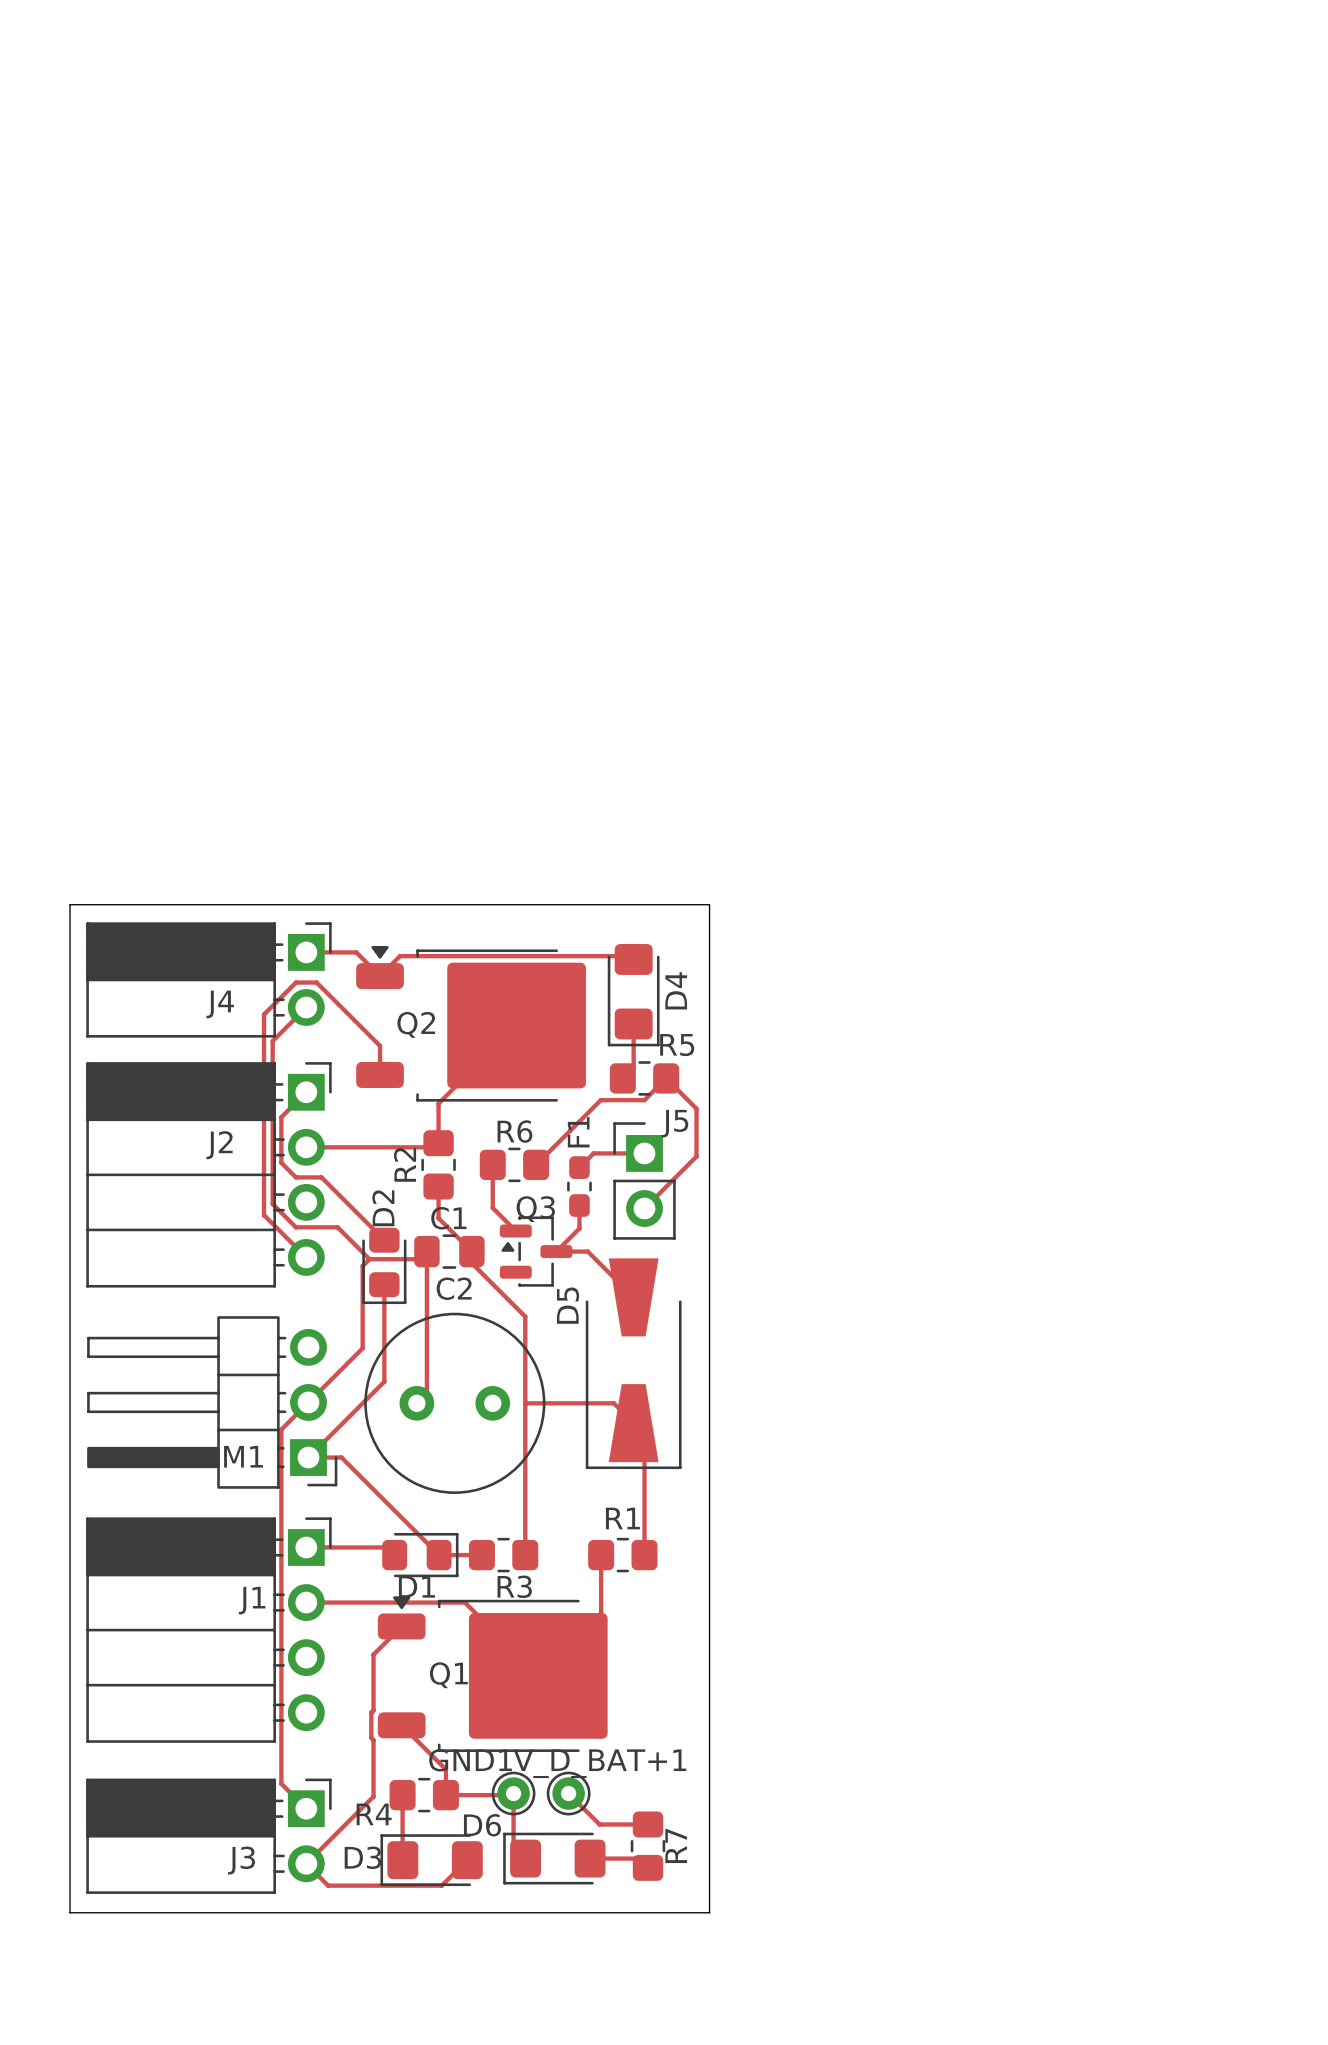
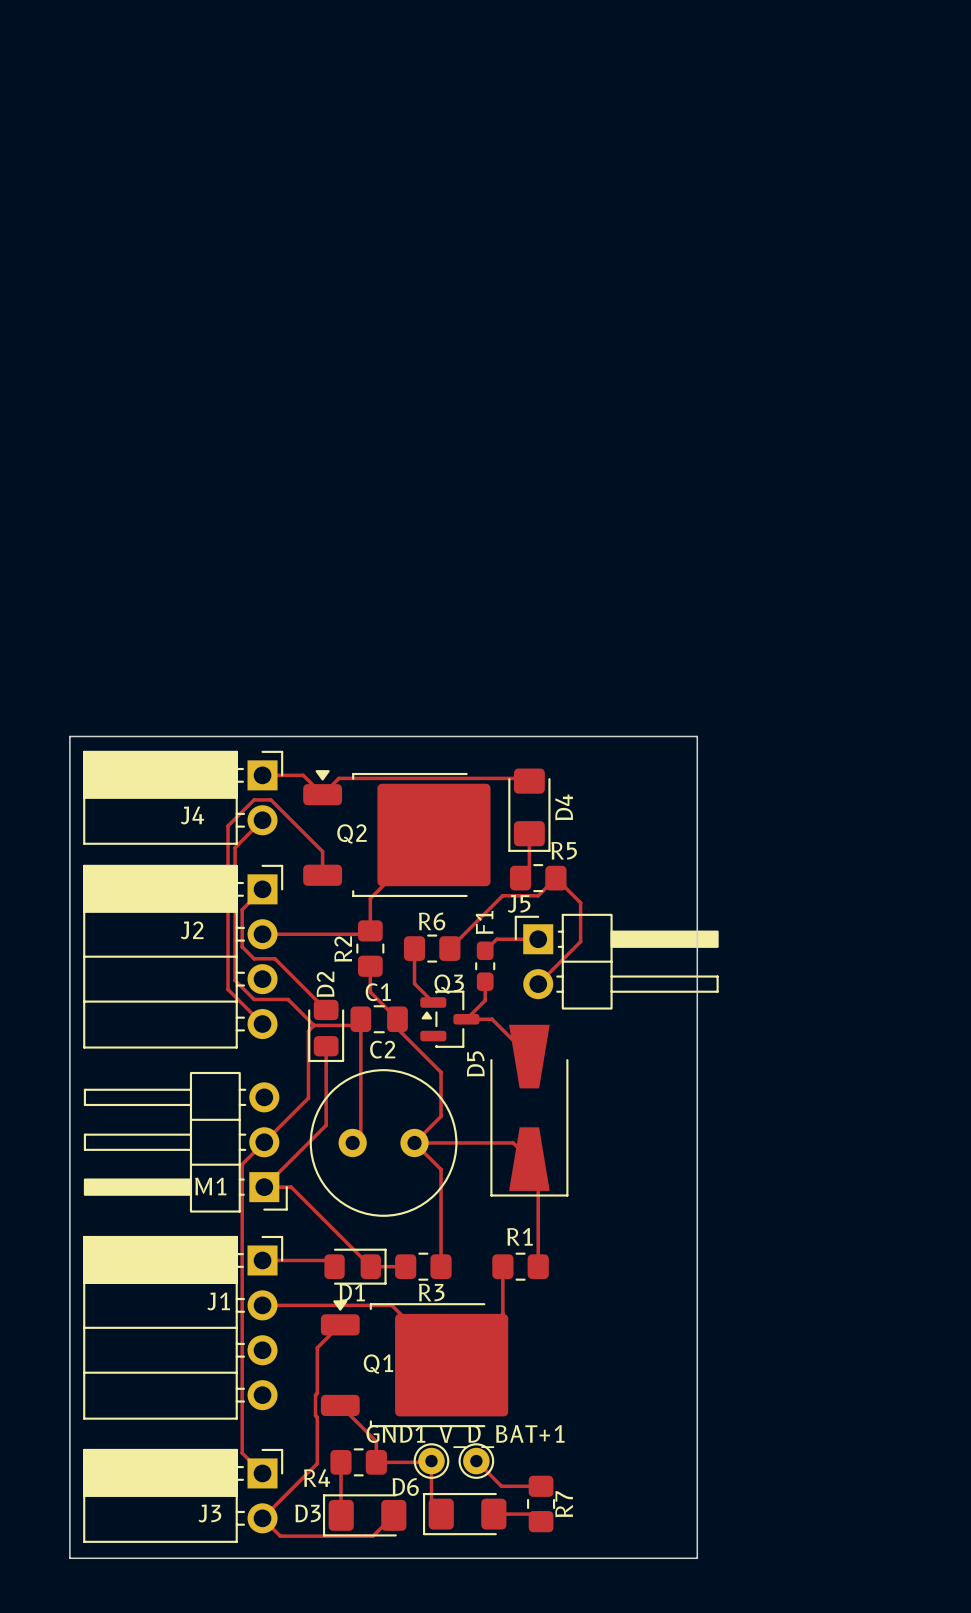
board edge: (709, 904) (709, 1912) -> (591, 736) (697, 736) (697, 1558) (591, 1558)
J5 footprint: [613, 1122, 676, 1240] -> [514, 913, 719, 1010]
J5 name position: J5 (674, 1123) -> J5 (519, 903)
track: (525, 1370) (525, 1435) -> (441, 1116) (414, 1142)
track: none -> (414, 1142) (441, 1169)
track: none -> (414, 1142) (441, 1142)

